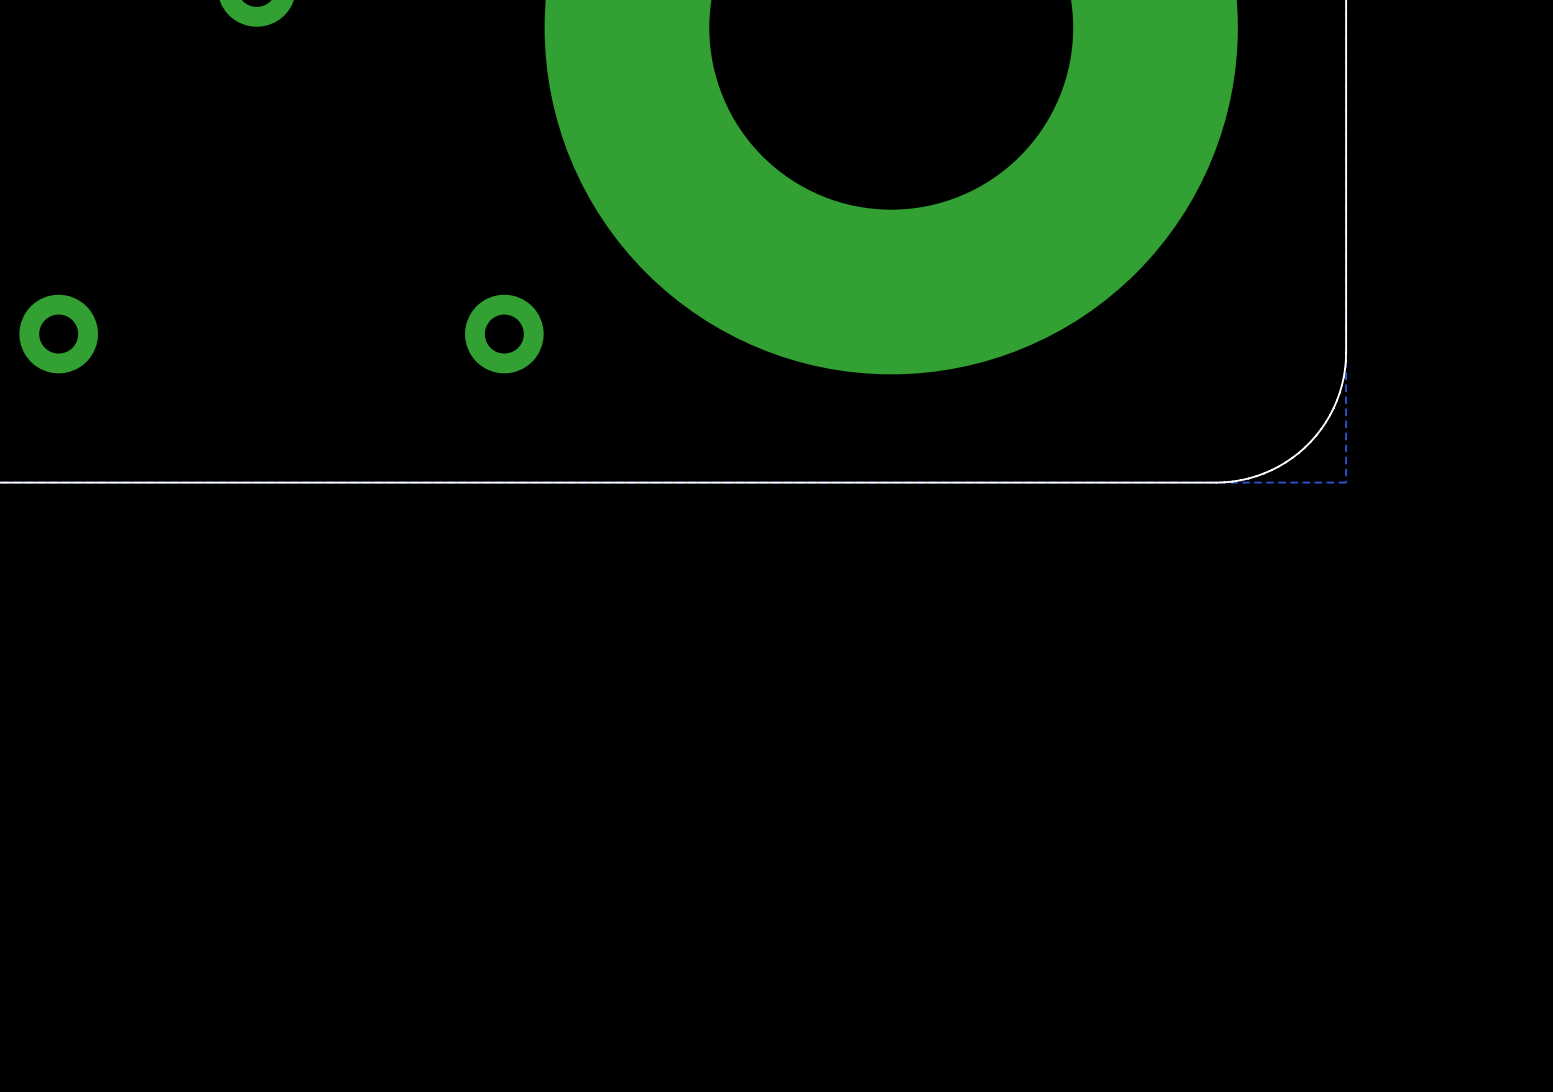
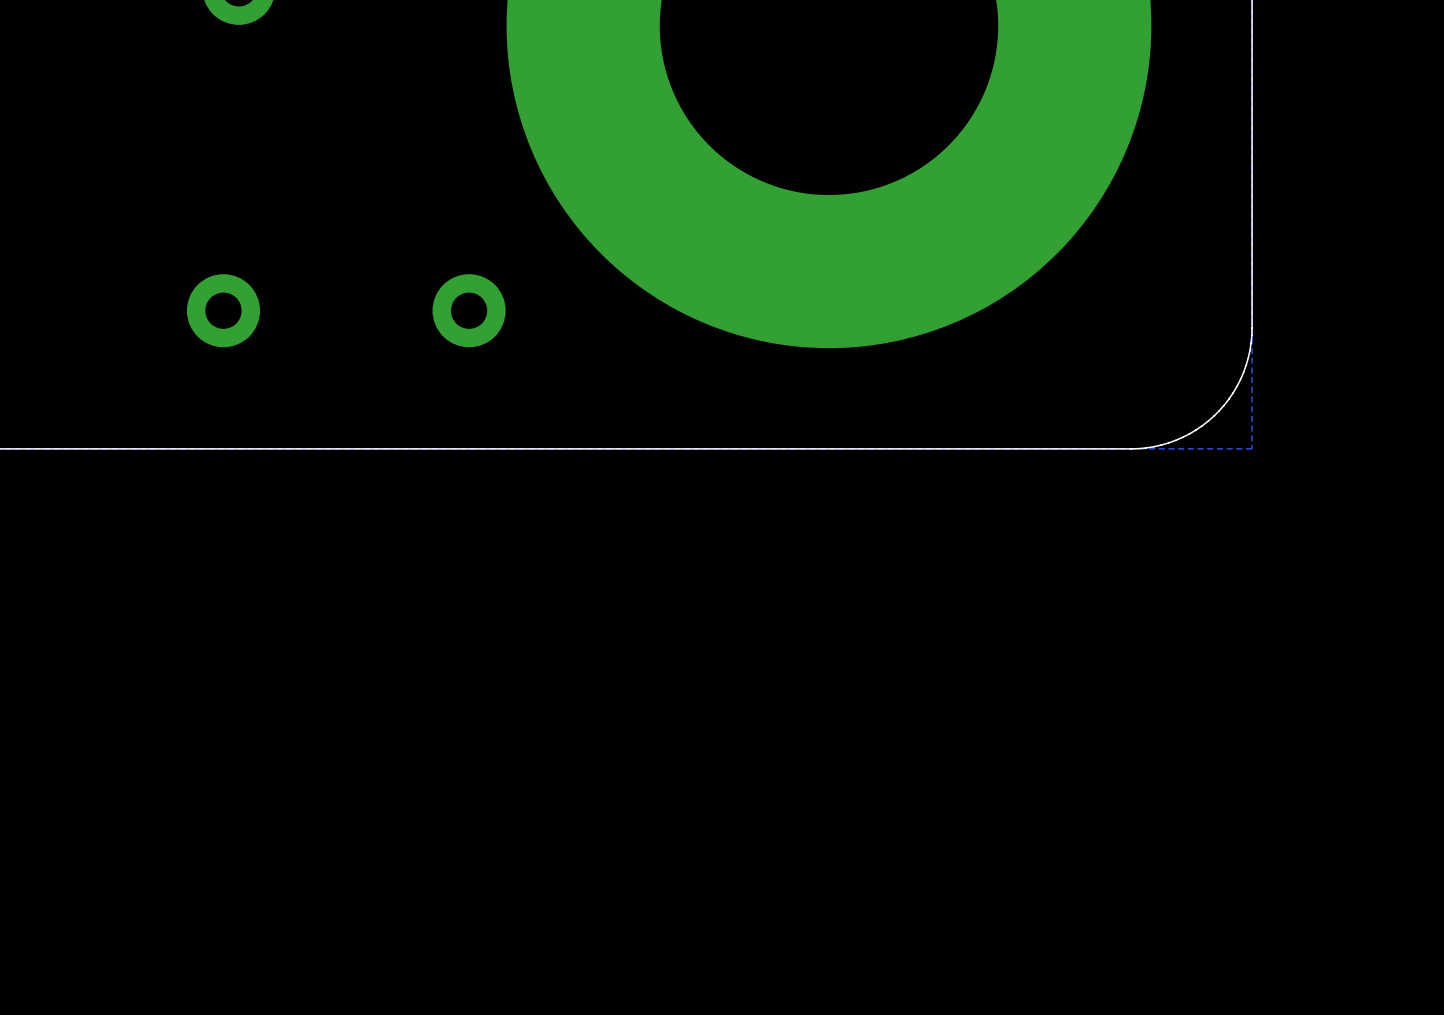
via position: (58, 334) -> (223, 310)

